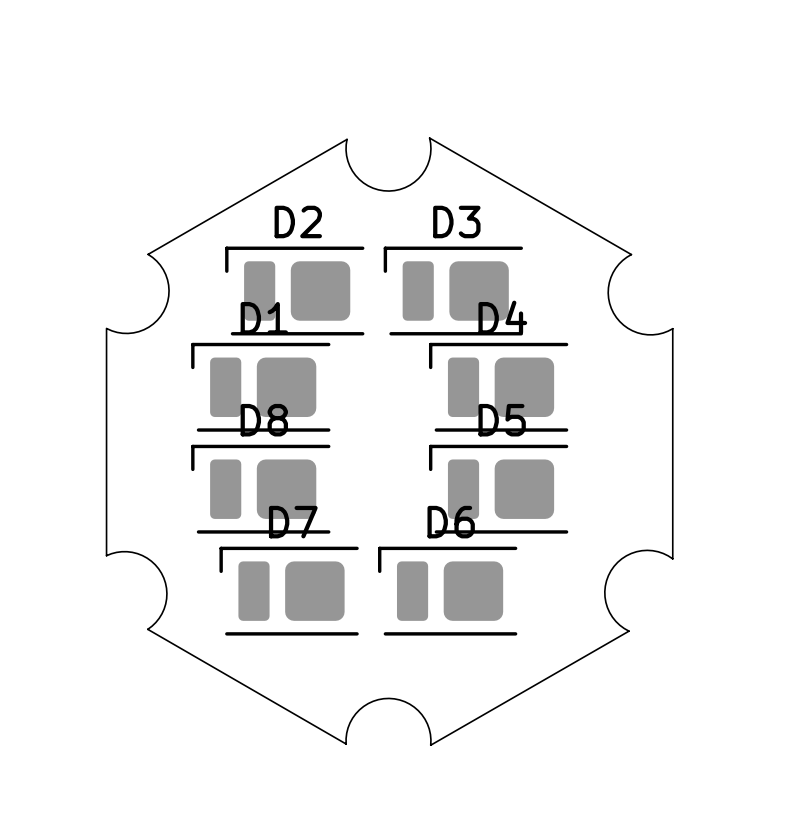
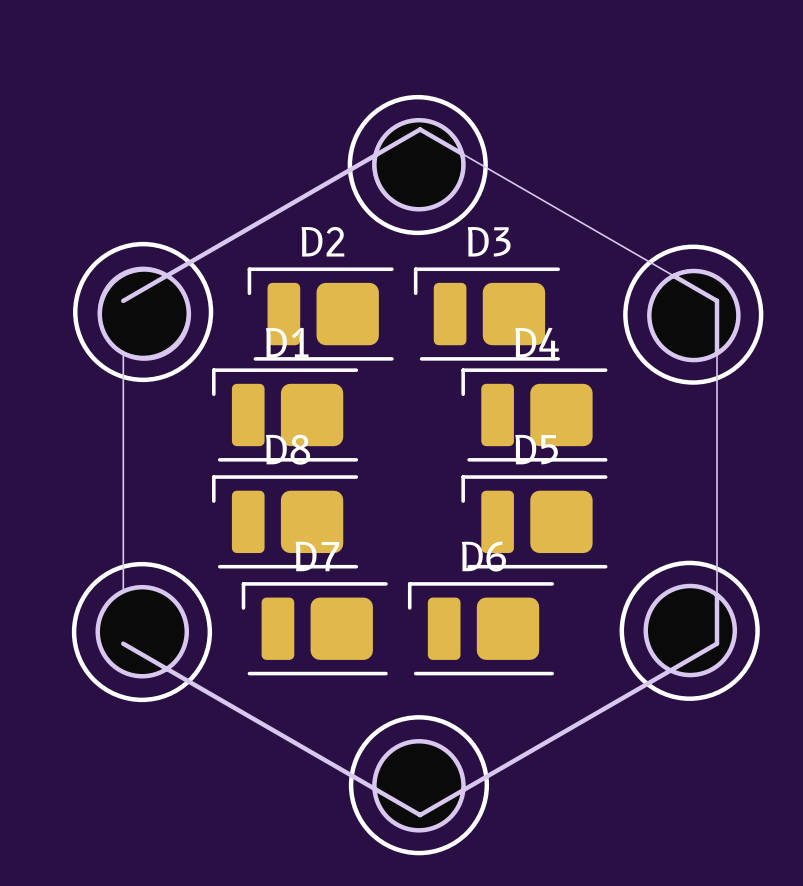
round board edge: none -> [372, 117, 466, 212]
board edge: (429, 138) (430, 148) (427, 164) (418, 178) (405, 187) (383, 190) (363, 182) (349, 166) (346, 155) (347, 139) (148, 254) (160, 265) (167, 279) (168, 296) (163, 311) (153, 324) (138, 331) (122, 333) (107, 328) -> (462, 153) (420, 129) (123, 300)
part: none -> (417, 165)
round board edge: none -> [97, 267, 192, 361]
round board edge: none -> [647, 268, 741, 363]
board edge: (631, 254) (618, 264) (610, 277) (608, 298) (613, 313) (623, 325) (642, 334) (658, 334) (672, 328) -> (673, 275) (717, 300) (717, 353)
part: none -> (143, 311)
part: none -> (693, 314)
round board edge: none -> [643, 583, 738, 678]
round board edge: none -> [95, 584, 190, 679]
board edge: (106, 555) (121, 551) (137, 553) (151, 561) (161, 573) (166, 588) (165, 604) (159, 618) (147, 629) (346, 744) (348, 727) (355, 713) (368, 703) (389, 698) (409, 704) (421, 714) (429, 729) (430, 745) (628, 631) (612, 617) (605, 596) (608, 575) (621, 558) (631, 553) (647, 550) (663, 553) (672, 558) -> (123, 643) (420, 815) (717, 643) (717, 594)
part: none -> (689, 630)
part: none -> (141, 632)
round board edge: none -> [372, 739, 466, 833]
part: none -> (418, 785)

